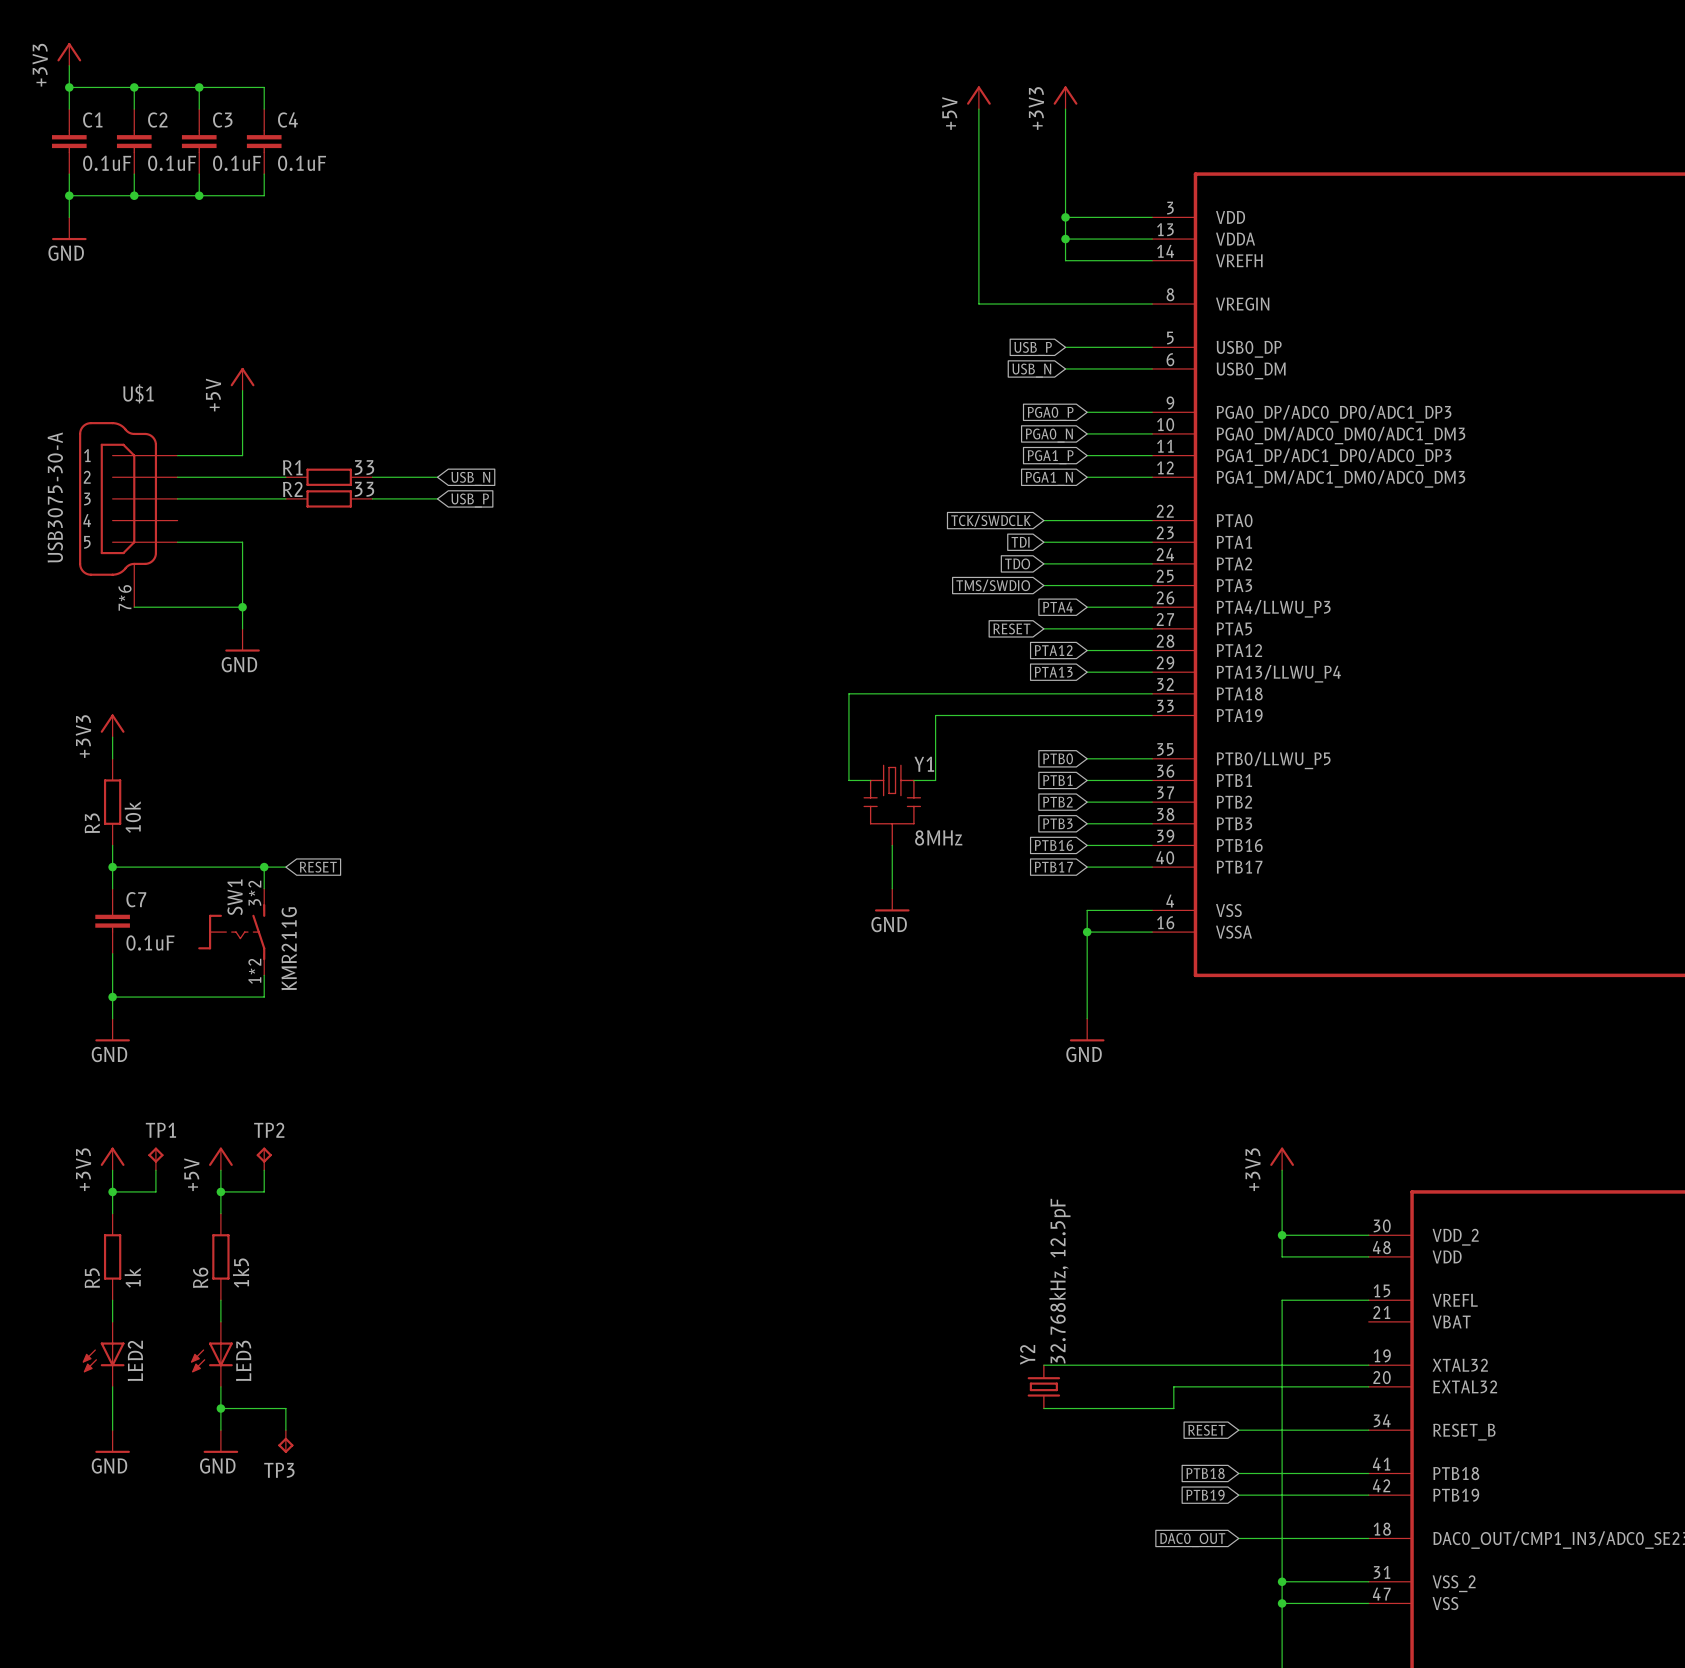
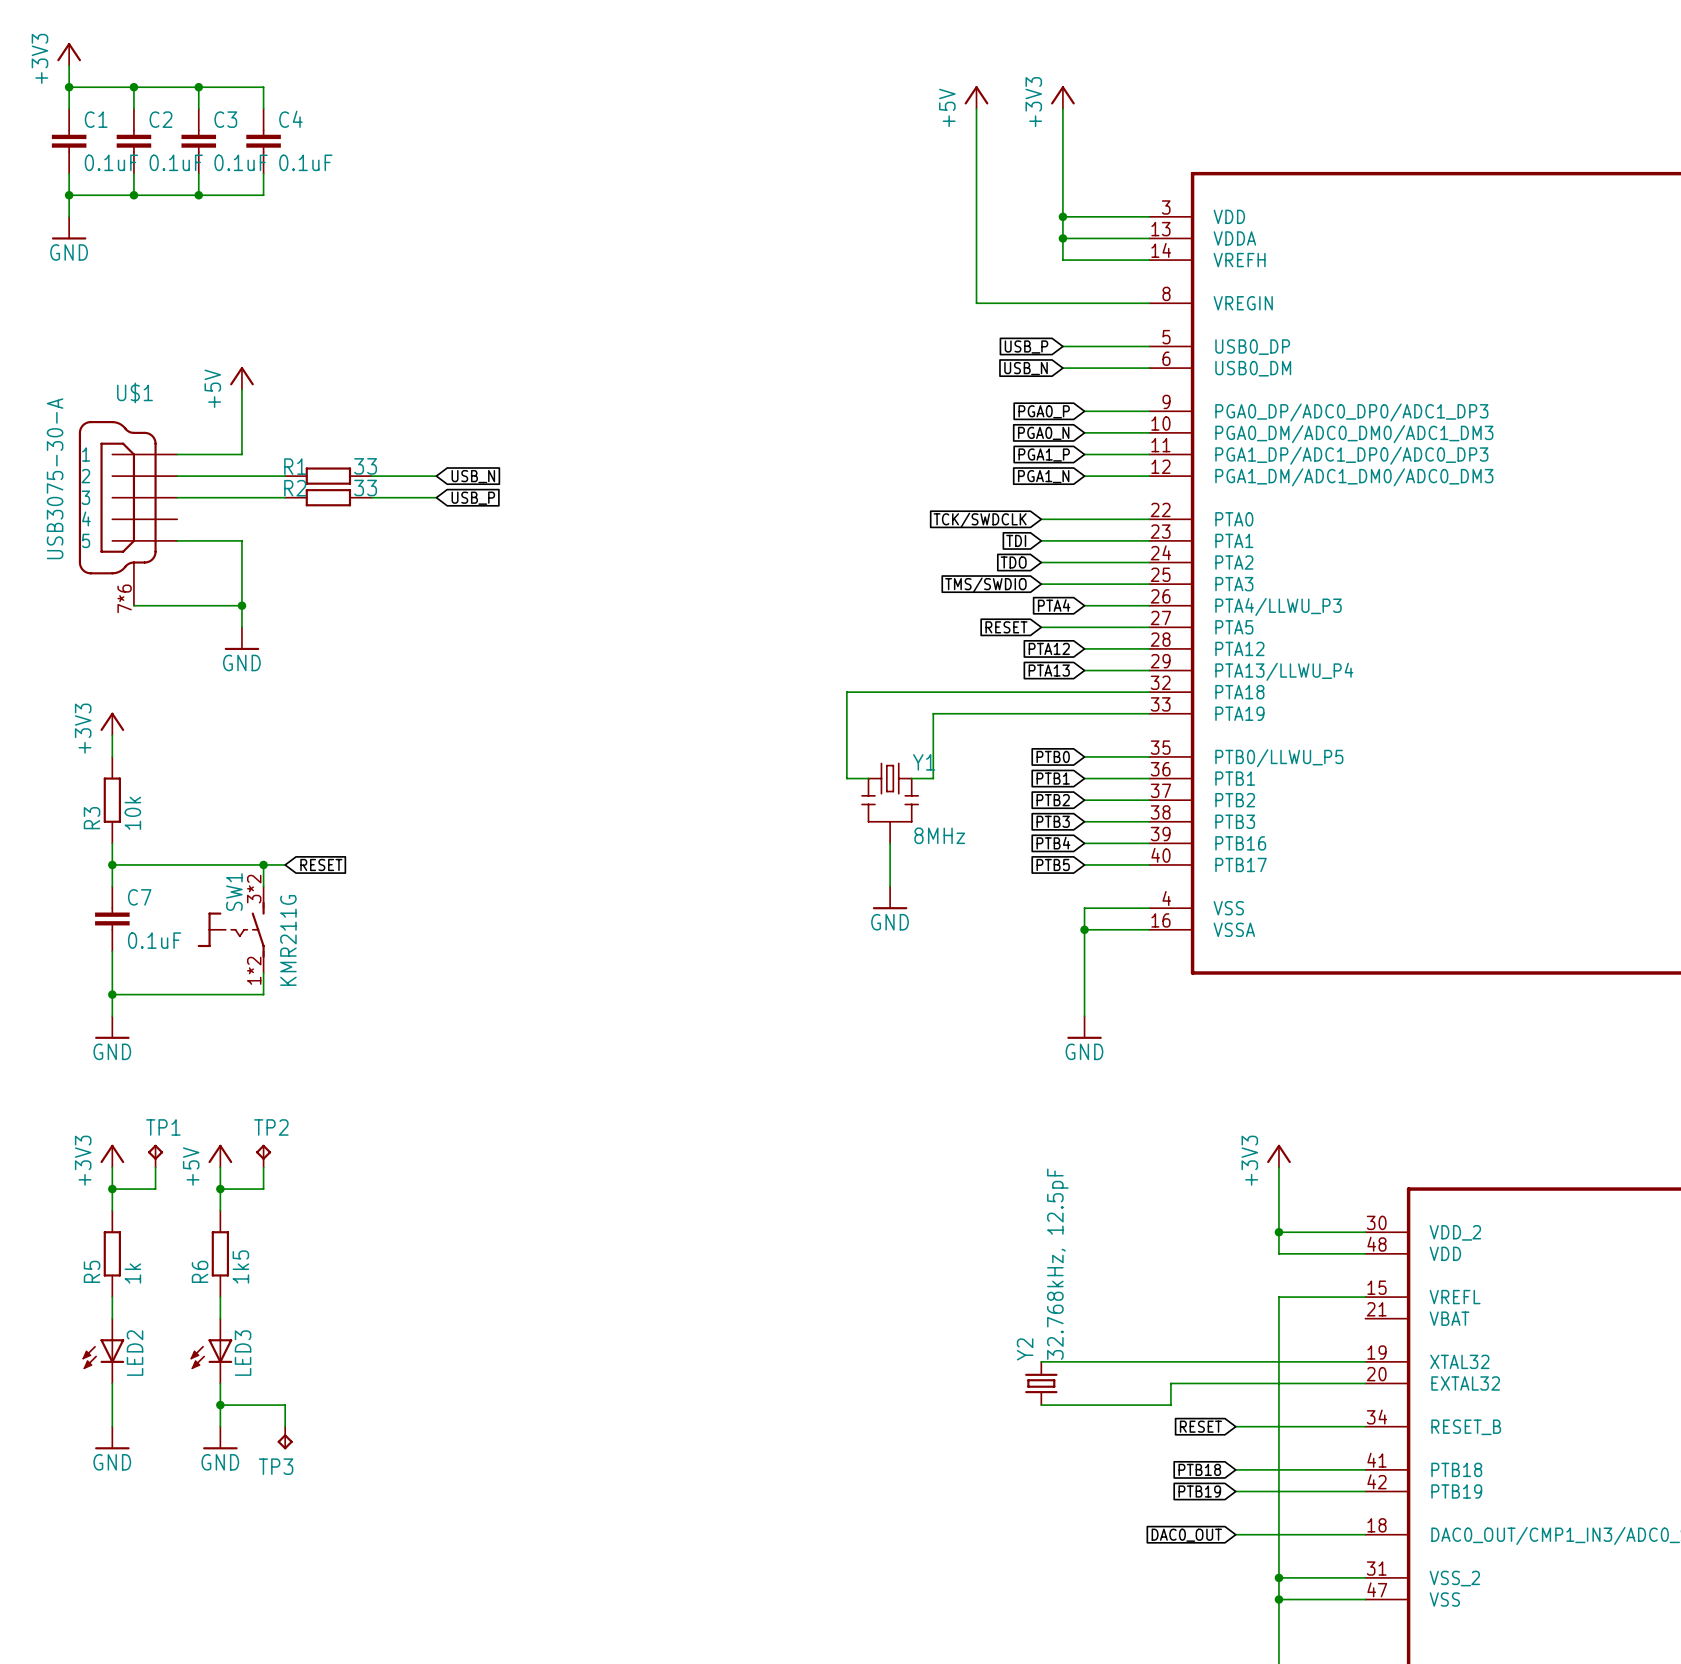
global label: PTB16 (1053, 845) -> PTB4 (1053, 843)
global label: PTB17 (1053, 867) -> PTB5 (1053, 864)

